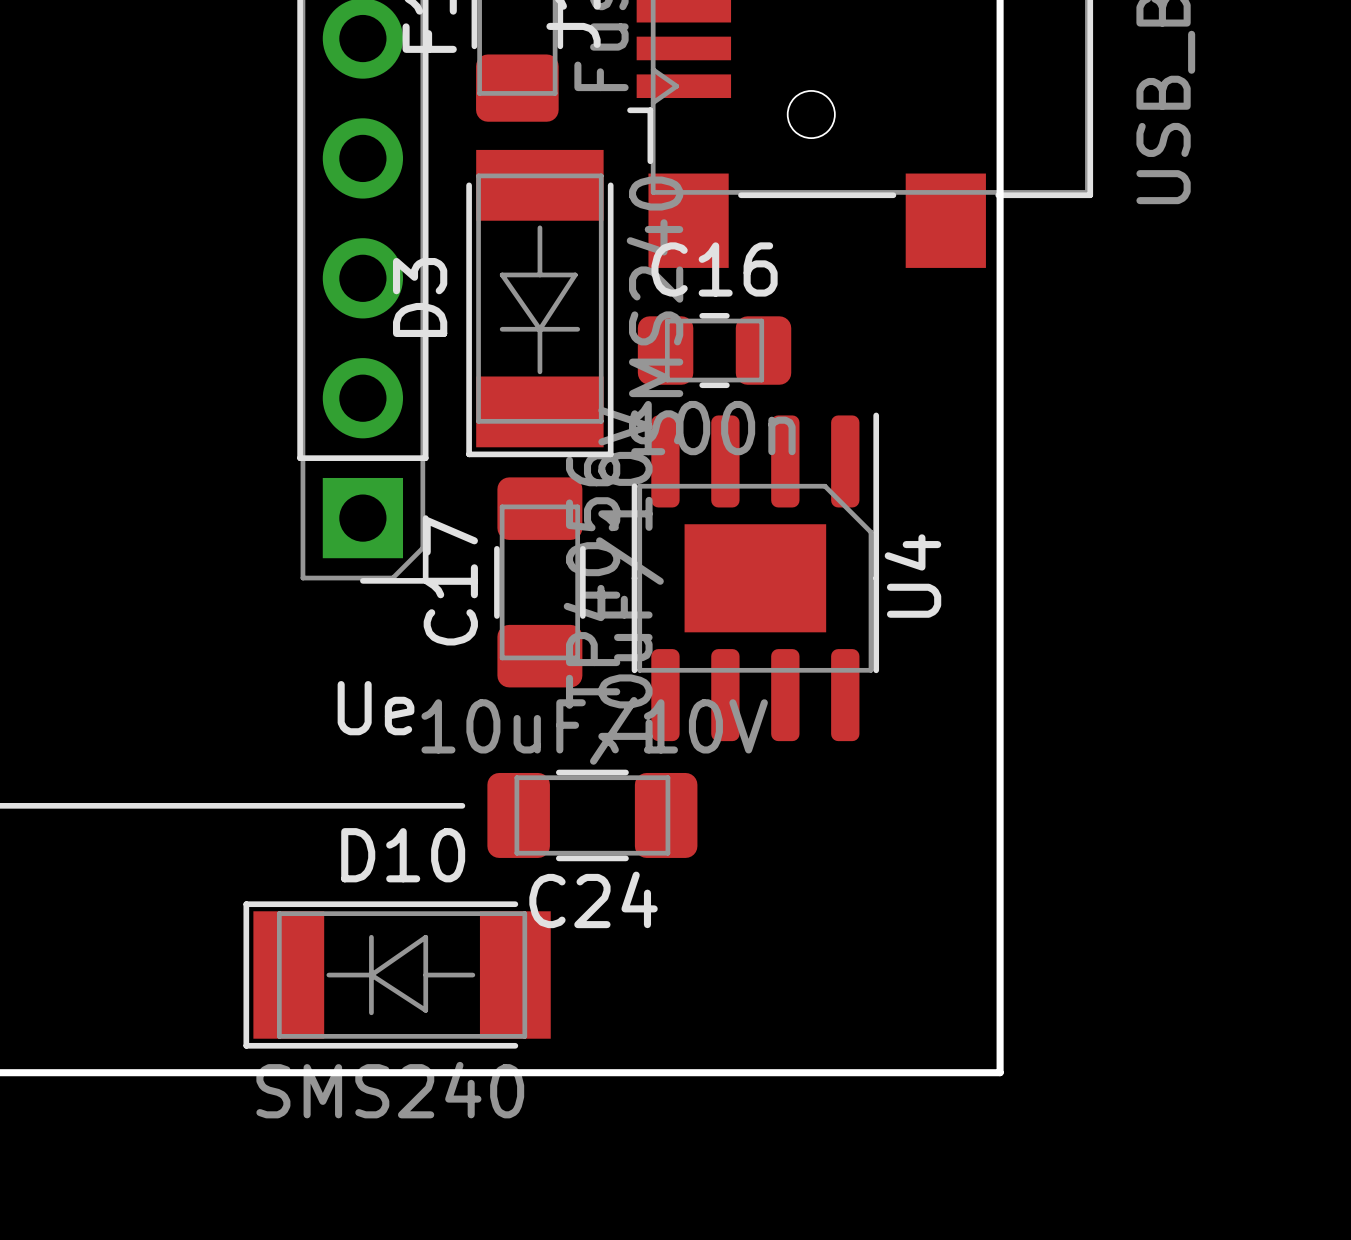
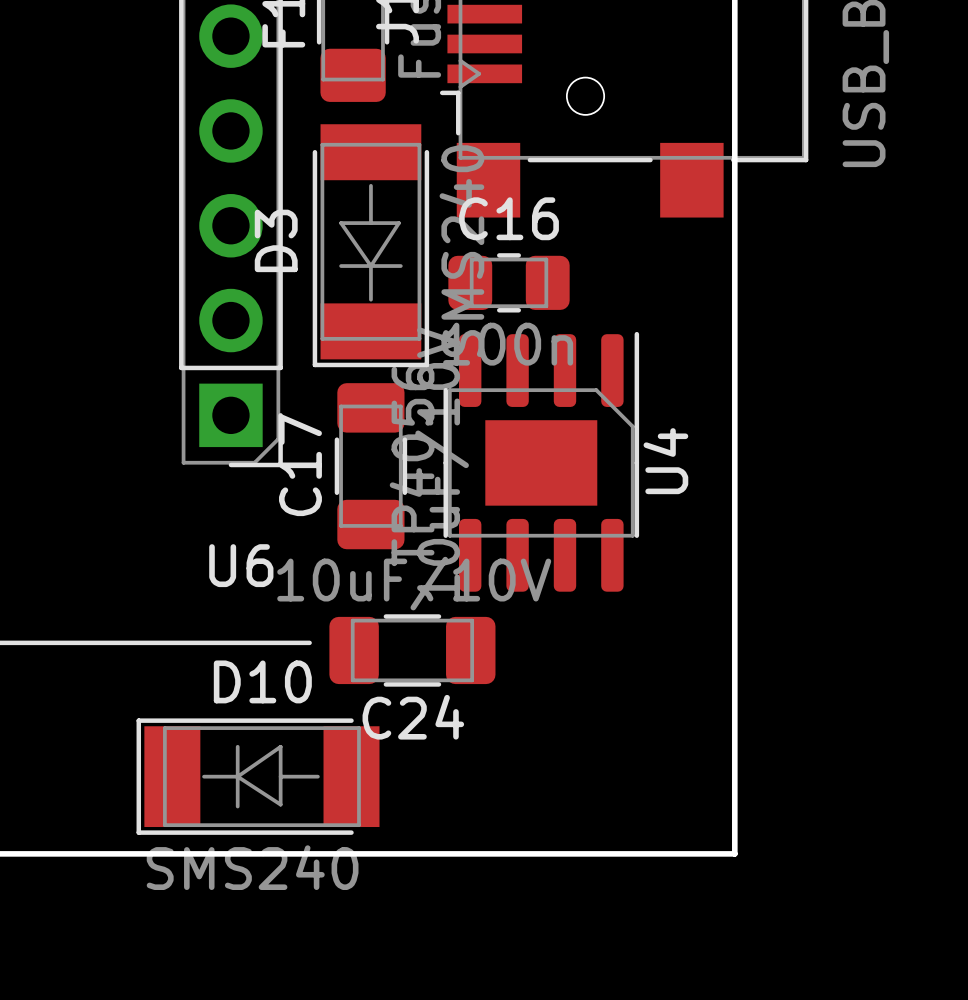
Ue name: Ue (376, 708) -> U6 (241, 565)

